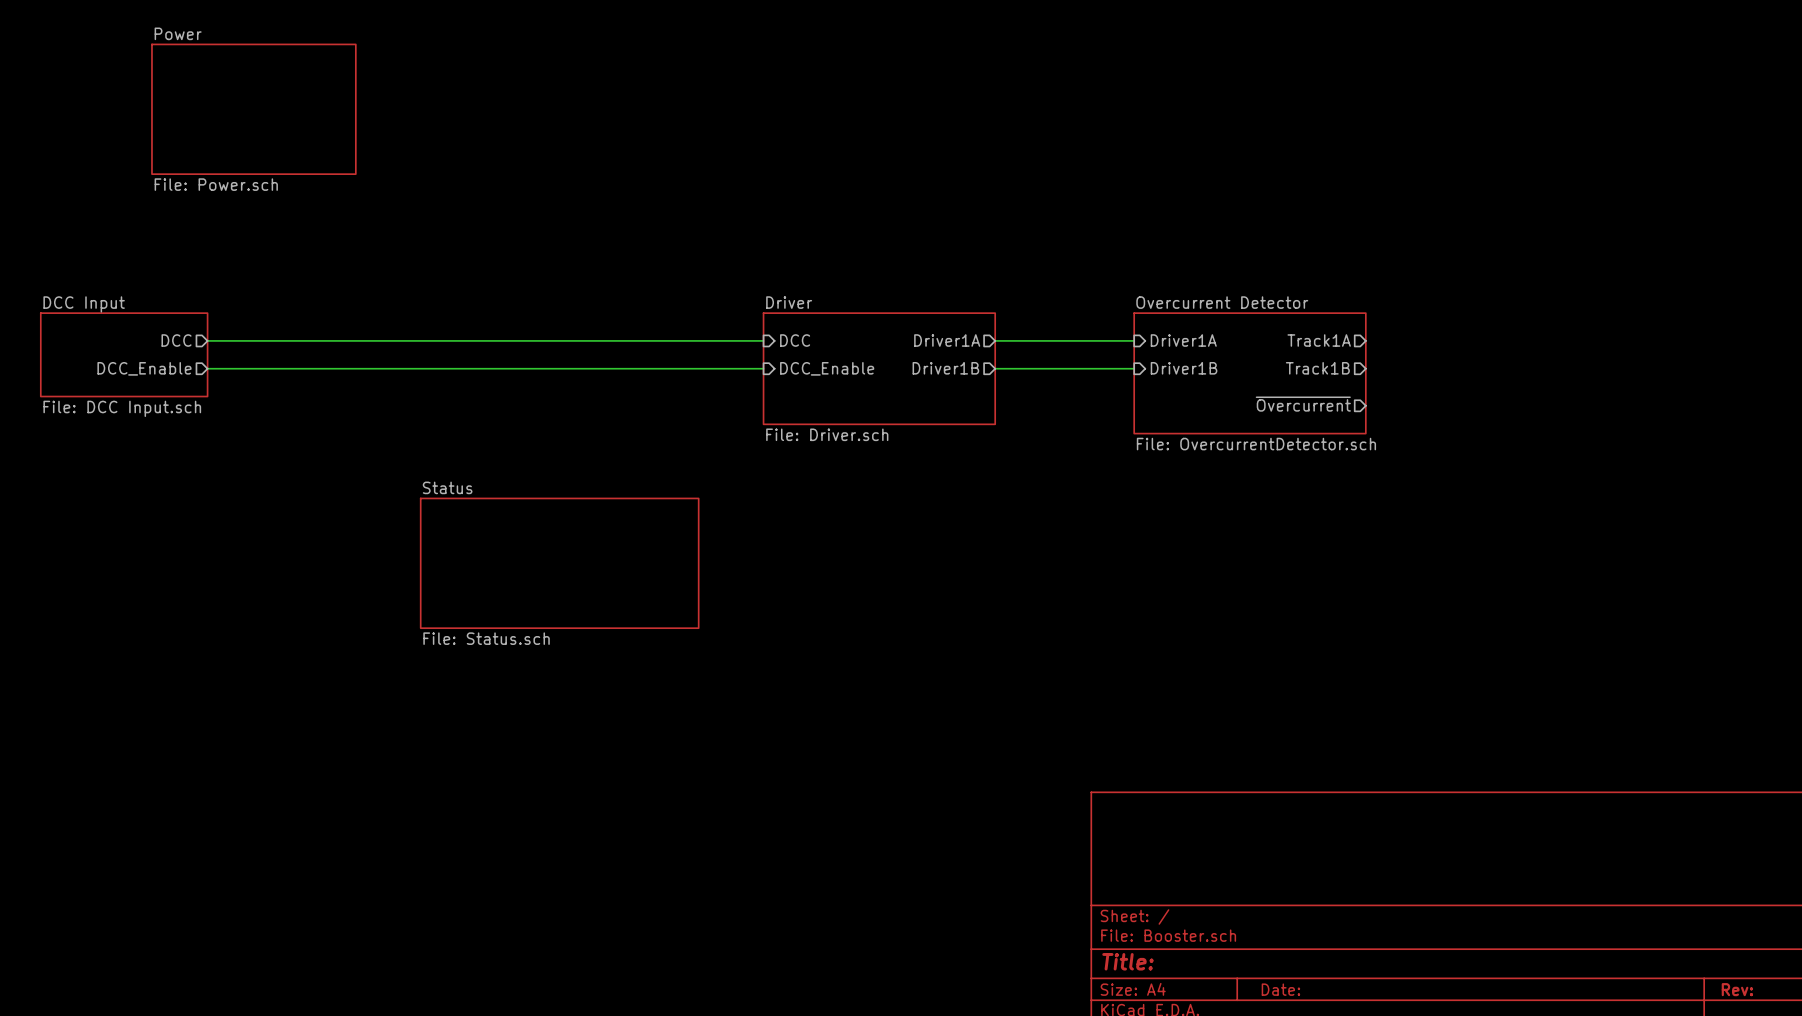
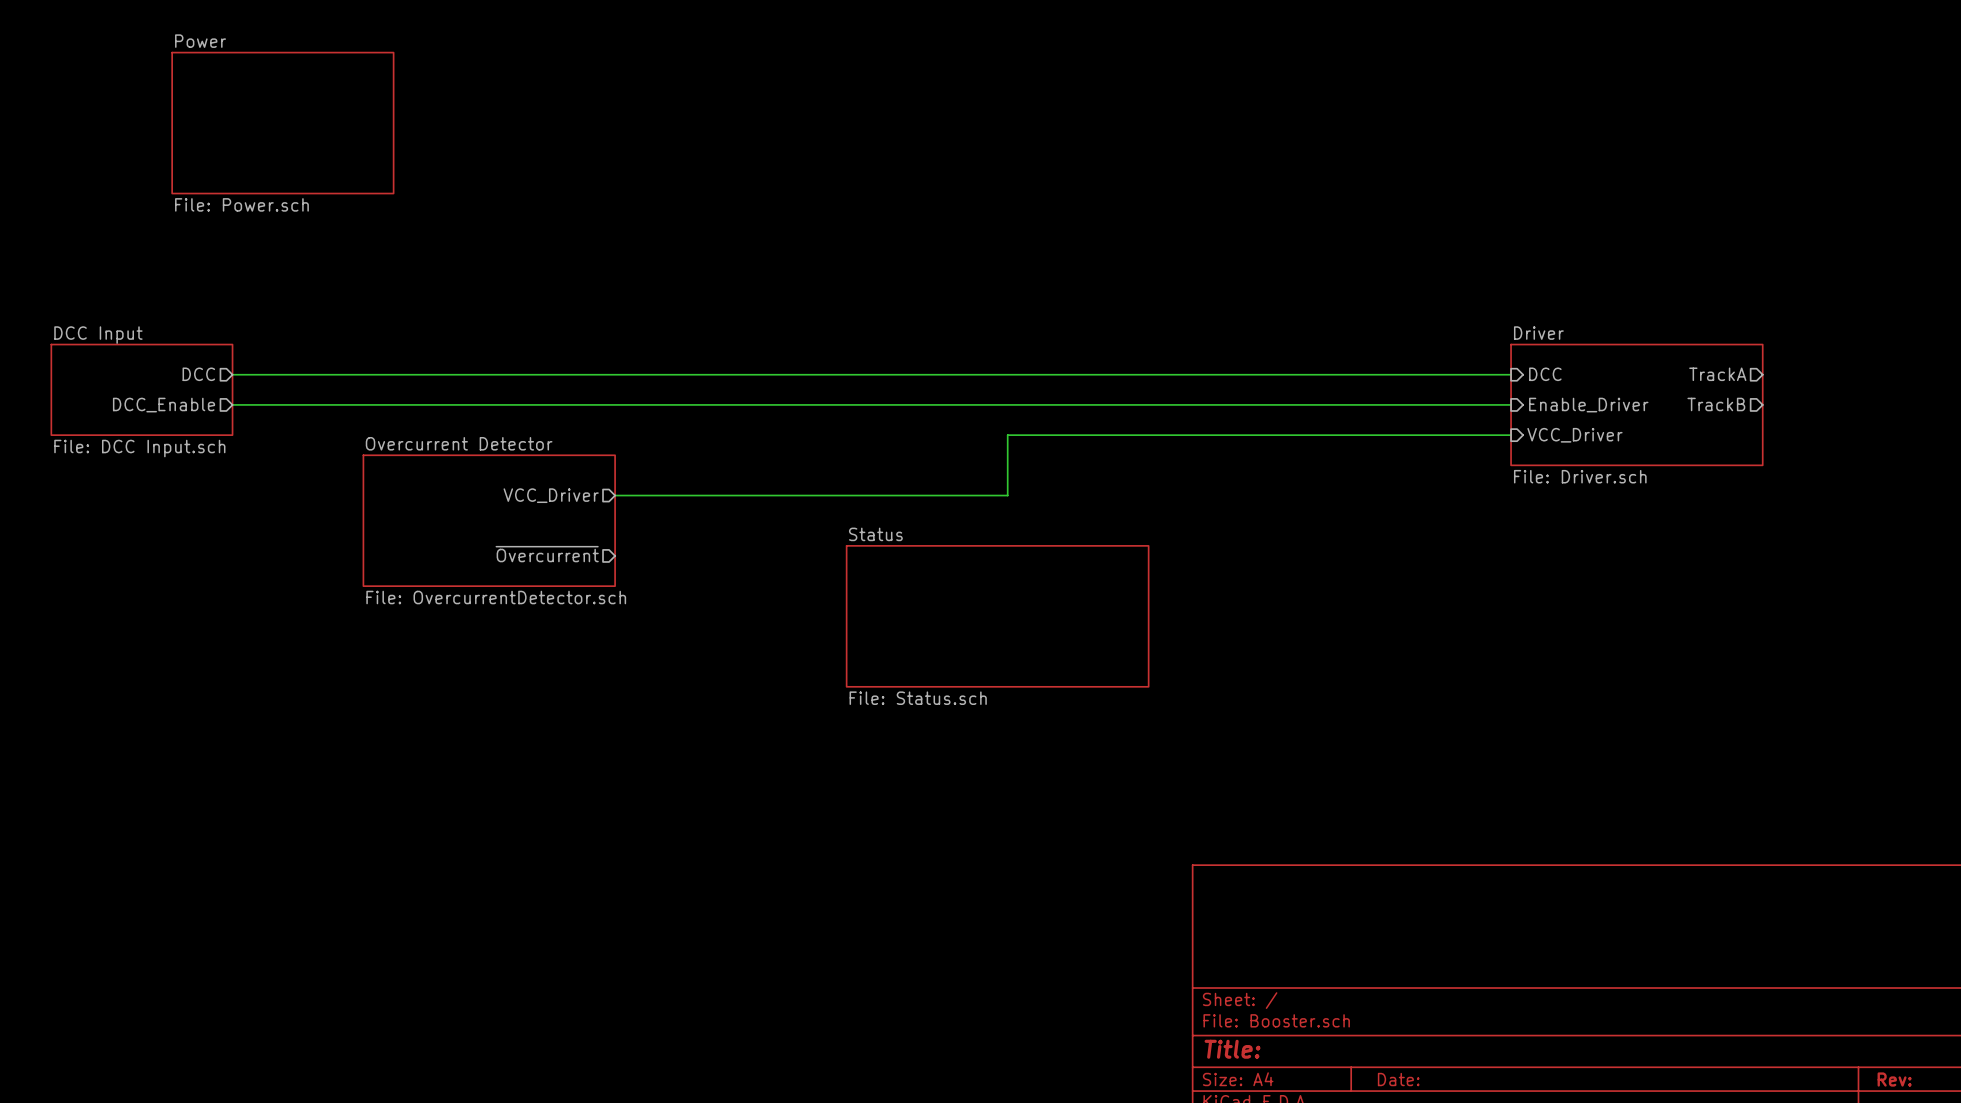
wire: none -> (836, 374) (1088, 374)
sheet pin: DCC (795, 340) -> none
sheet pin: Driver1A (947, 340) -> none
wire: none -> (1239, 374) (1511, 374)
sheet pin: Driver1A (1183, 340) -> none
sheet pin: Track1A (1319, 340) -> none
sheet pin: none -> DCC (1545, 374)
sheet pin: none -> TrackA (1717, 374)
wire: none -> (836, 404) (1088, 404)
sheet pin: DCC_Enable (827, 368) -> none
sheet Driver: File: Driver.sch (879, 368) -> none
sheet pin: Driver1B (945, 368) -> none
wire: none -> (1239, 404) (1511, 404)
sheet pin: Driver1B (1184, 368) -> none
sheet pin: Track1B (1317, 368) -> none
sheet pin: none -> Enable_Driver (1588, 405)
sheet Driver: none -> File: Driver.sch (1636, 404)
sheet pin: none -> TrackB (1716, 404)
sheet Overcurrent Detector: File: OvercurrentDetector.sch (1250, 373) -> none
wire: none -> (1511, 435) (1007, 435) (1007, 495) (615, 495)
sheet pin: none -> VCC_Driver (1574, 435)
sheet pin: ~{Overcurrent} (1303, 404) -> none
sheet pin: none -> VCC_Driver (551, 495)
sheet Overcurrent Detector: none -> File: OvercurrentDetector.sch (489, 520)
sheet pin: none -> ~{Overcurrent} (547, 554)
sheet Status: File: Status.sch (559, 563) -> none
sheet Status: none -> File: Status.sch (997, 616)

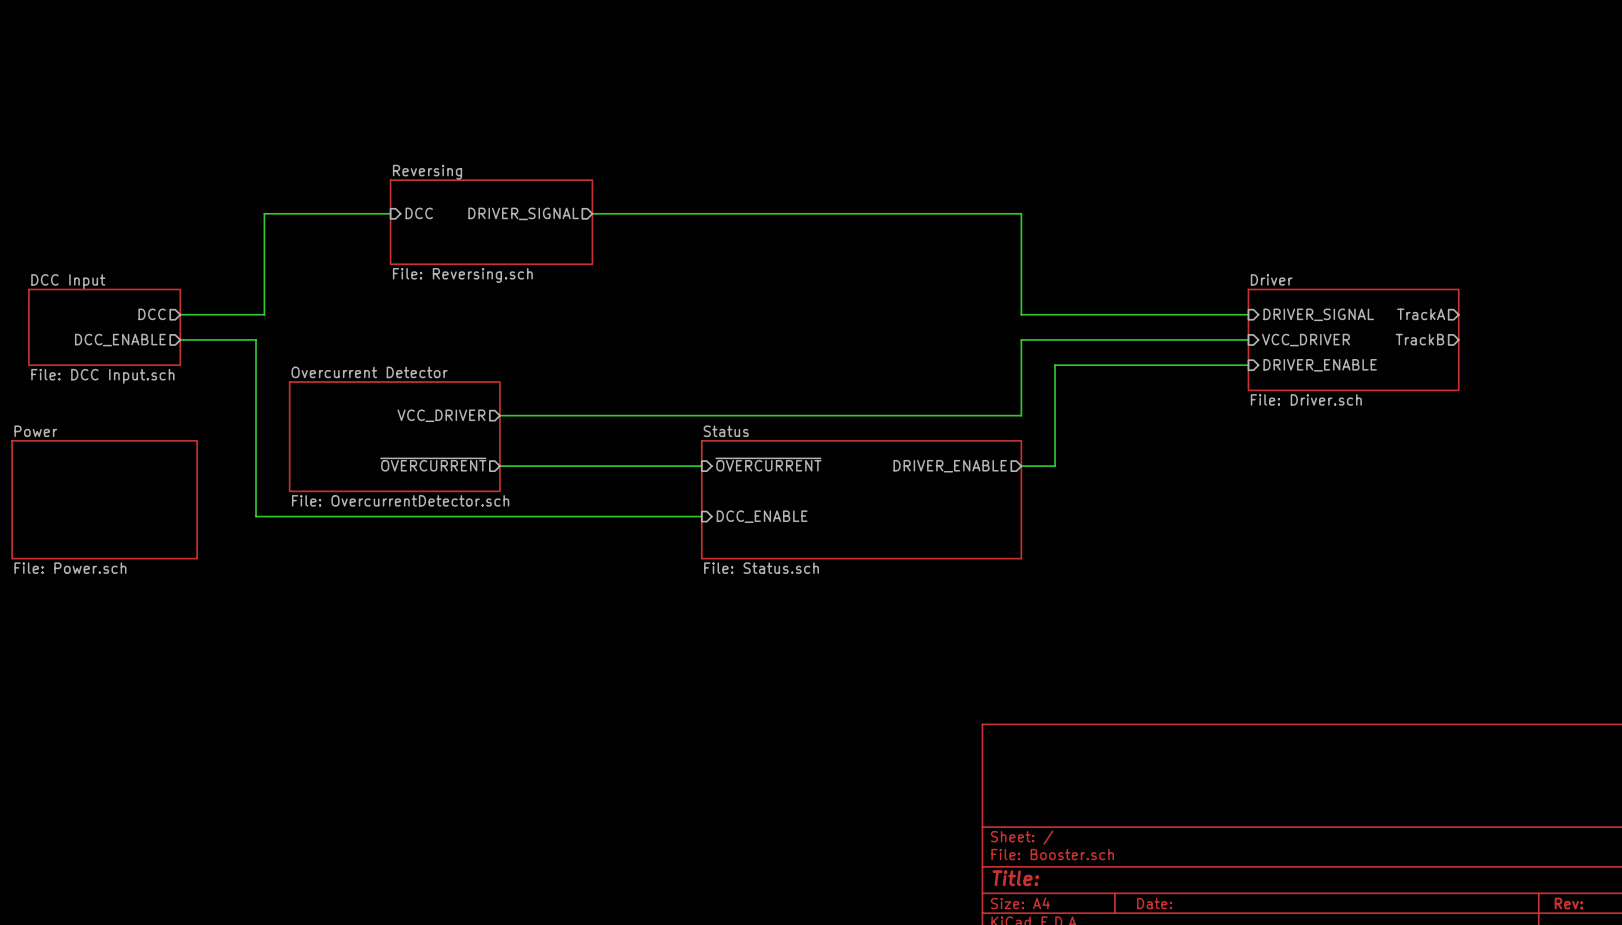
sheet Power: File: Power.sch (282, 123) -> none
wire: none -> (390, 213) (264, 213) (264, 314)
sheet pin: none -> DCC (419, 213)
sheet pin: none -> DRIVER_SIGNAL (523, 213)
sheet Reversing: none -> File: Reversing.sch (491, 222)
wire: (333, 374) (1239, 374) -> (592, 213) (1021, 213) (1021, 314)
sheet pin: DCC (1545, 374) -> DRIVER_SIGNAL (1318, 314)
wire: (323, 404) (1239, 404) -> (256, 339) (256, 516) (701, 516)
sheet pin: DCC_Enable (164, 405) -> DCC_ENABLE (120, 340)
sheet pin: Enable_Driver (1588, 405) -> VCC_DRIVER (1305, 340)
wire: (1279, 435) (1007, 435) (1007, 495) -> (1021, 339) (1021, 415) (827, 415)
wire: none -> (1055, 365) (1055, 466) (1021, 466)
sheet pin: VCC_Driver (1574, 435) -> DRIVER_ENABLE (1320, 365)
sheet pin: VCC_Driver (551, 495) -> VCC_DRIVER (441, 415)
sheet pin: ~{Overcurrent} (547, 554) -> ~{OVERCURRENT} (433, 464)
sheet pin: none -> ~{OVERCURRENT} (768, 464)
wire: none -> (499, 466) (701, 466)
sheet pin: none -> DRIVER_ENABLE (950, 466)
sheet Power: none -> File: Power.sch (104, 499)
sheet Status: none -> File: Status.sch (861, 499)
sheet pin: none -> DCC_ENABLE (762, 516)
sheet Status: File: Status.sch (997, 616) -> none

